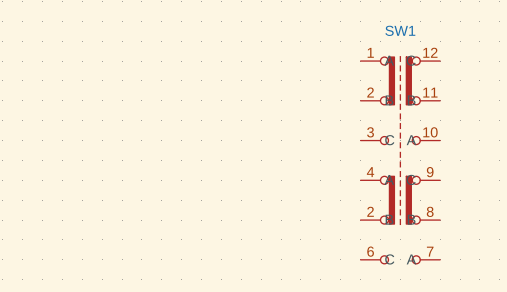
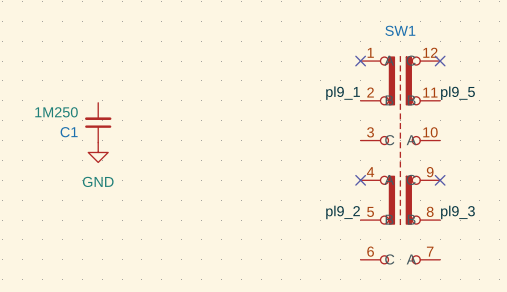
no-connect mark: none -> (360, 61)
no-connect mark: none -> (440, 61)
label: none -> pl9_1 (343, 93)
label: none -> pl9_5 (457, 93)
C1: none -> 1M250 (98, 122)
power symbol: none -> GND (98, 152)
no-connect mark: none -> (360, 180)
no-connect mark: none -> (440, 180)
SW1 pin number: 2 (370, 211) -> 5 (370, 211)
label: none -> pl9_2 (343, 212)
label: none -> pl9_3 (457, 212)

